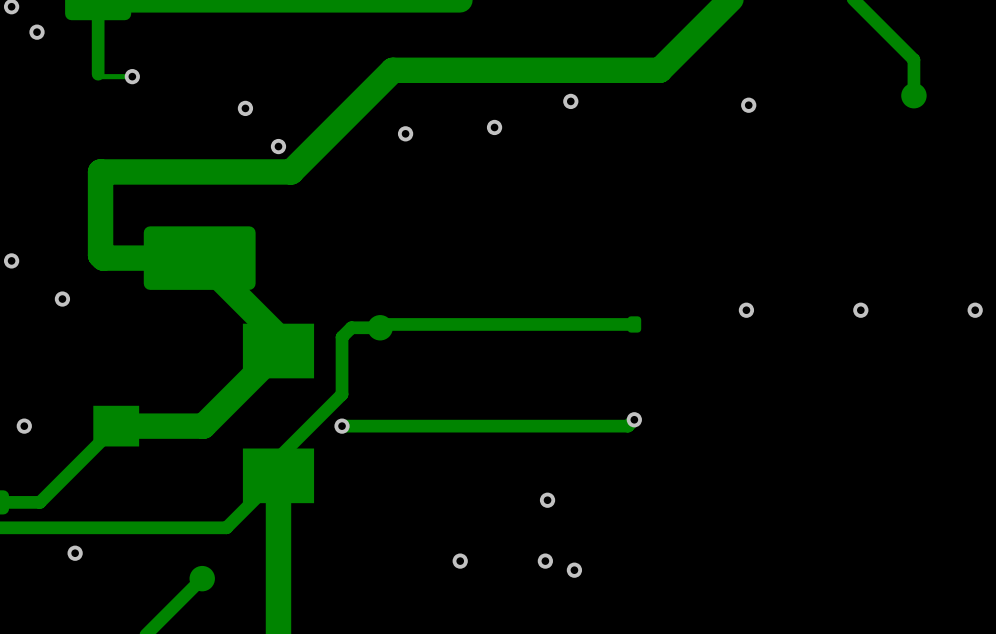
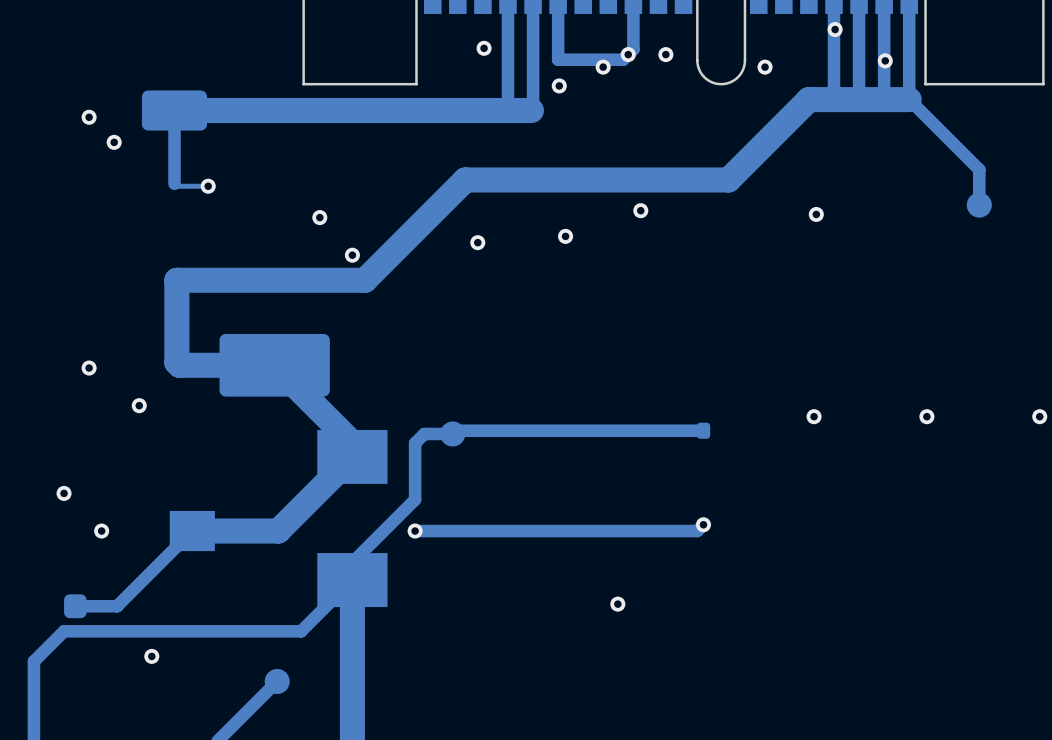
via: (460, 561) -> none
via: (545, 561) -> none
via: (574, 570) -> none

